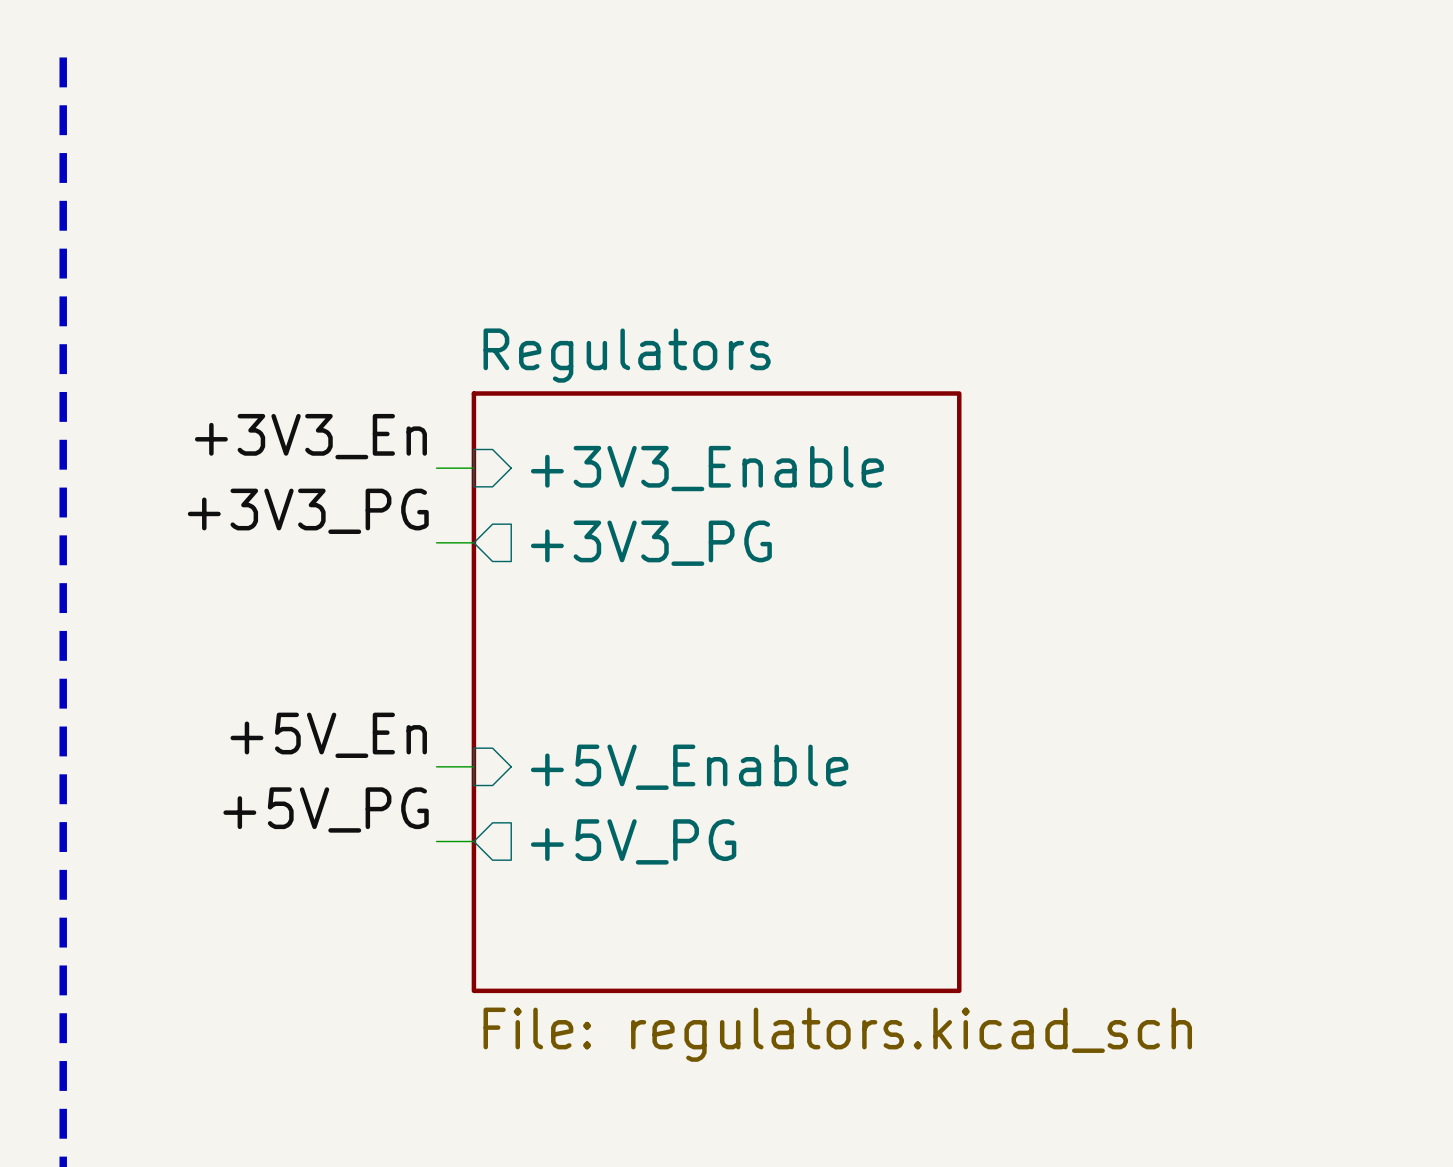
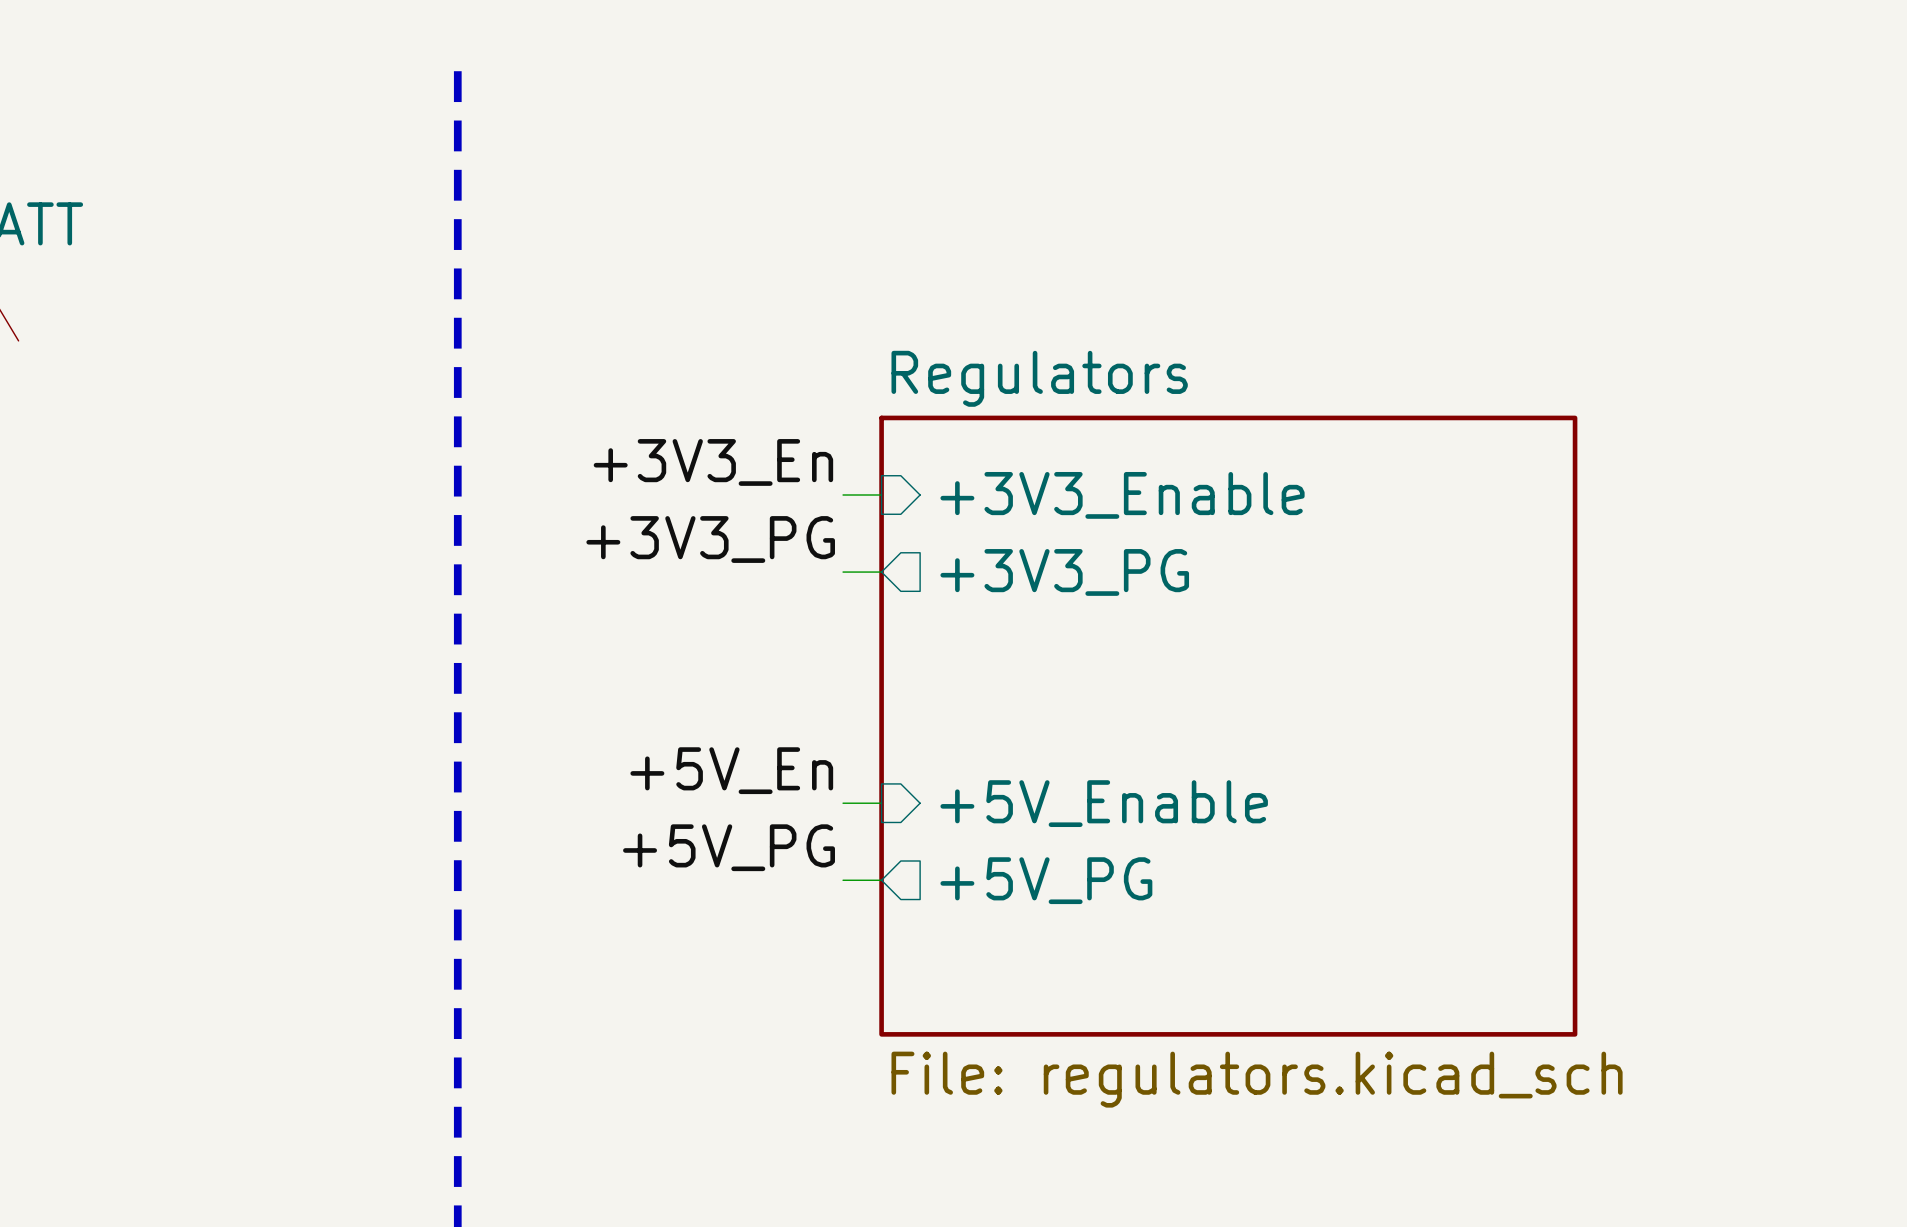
sheet Regulators: File: regulators.kicad_sch (716, 692) -> none
sheet Regulators: none -> File: regulators.kicad_sch (1228, 726)

